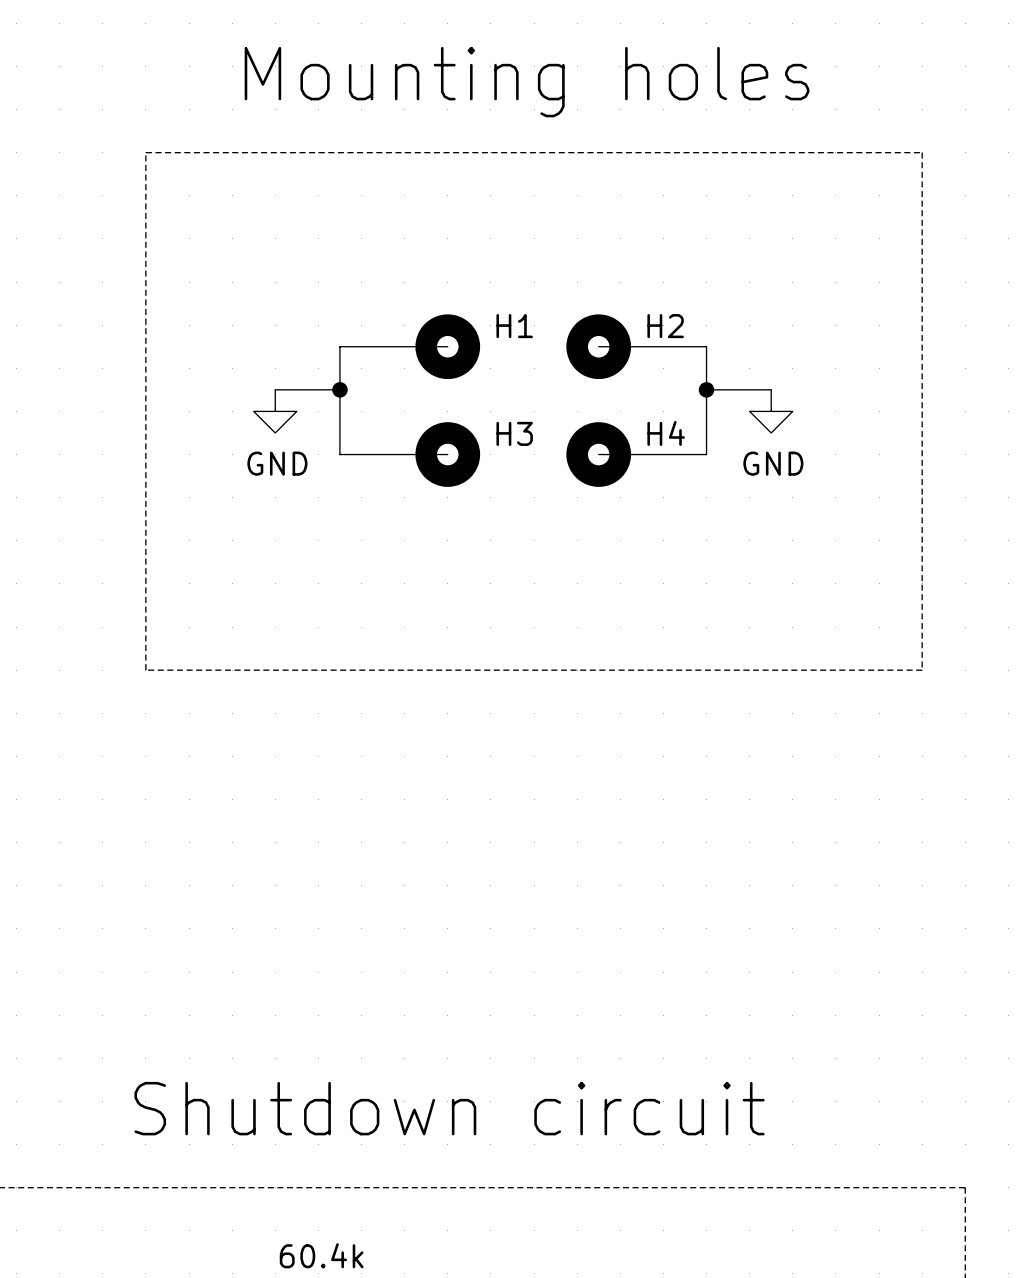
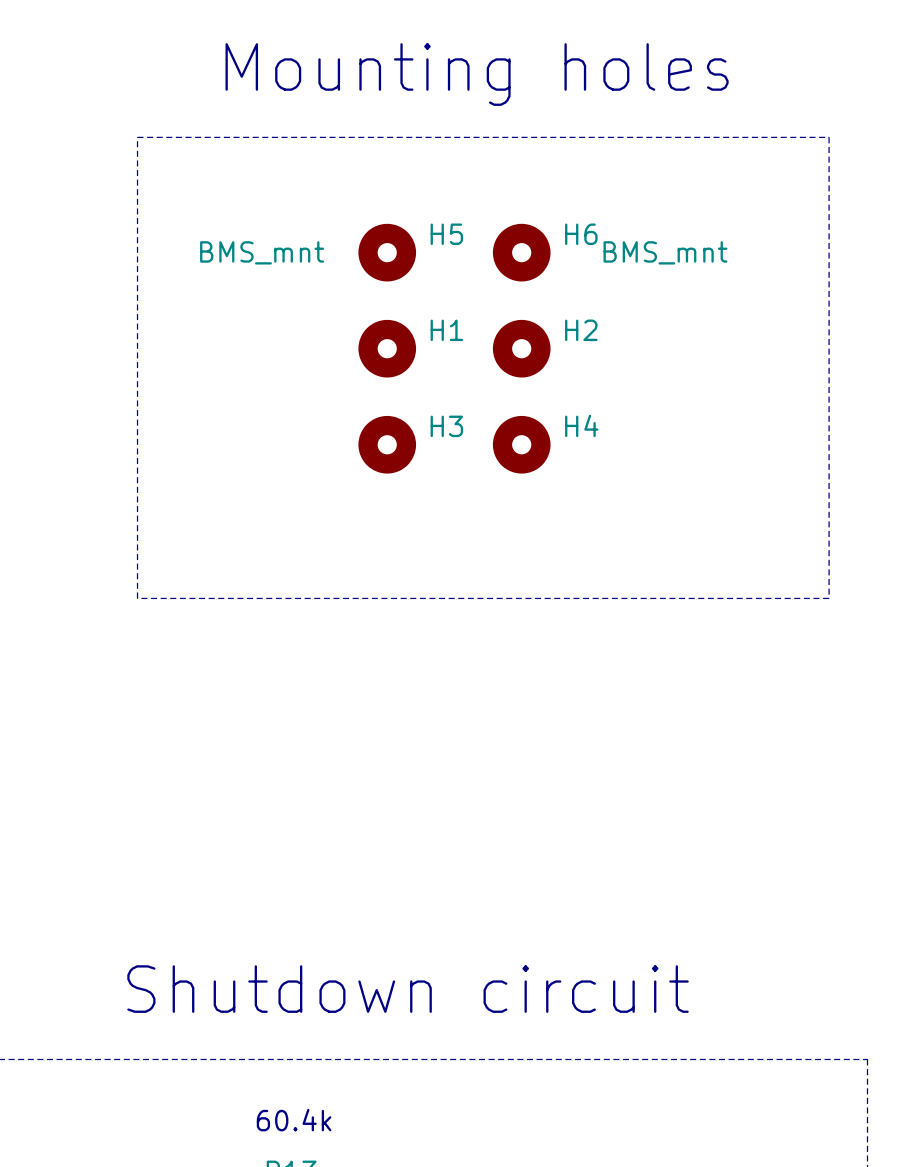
H5: none -> BMS_mnt (387, 252)
H6: none -> BMS_mnt (521, 252)
wire: (447, 346) (339, 346) (339, 454) (447, 454) -> none
H1 position: (447, 346) -> (387, 348)
wire: (598, 346) (706, 346) (706, 454) (598, 454) -> none
H2 position: (598, 346) -> (521, 348)
wire: (275, 389) (339, 389) -> none
junction: (339, 389) -> none
wire: (706, 389) (771, 389) -> none
junction: (706, 389) -> none
power symbol: GND (275, 411) -> none
power symbol: GND (771, 411) -> none
H3 position: (447, 454) -> (387, 444)
H4 position: (598, 454) -> (521, 444)

